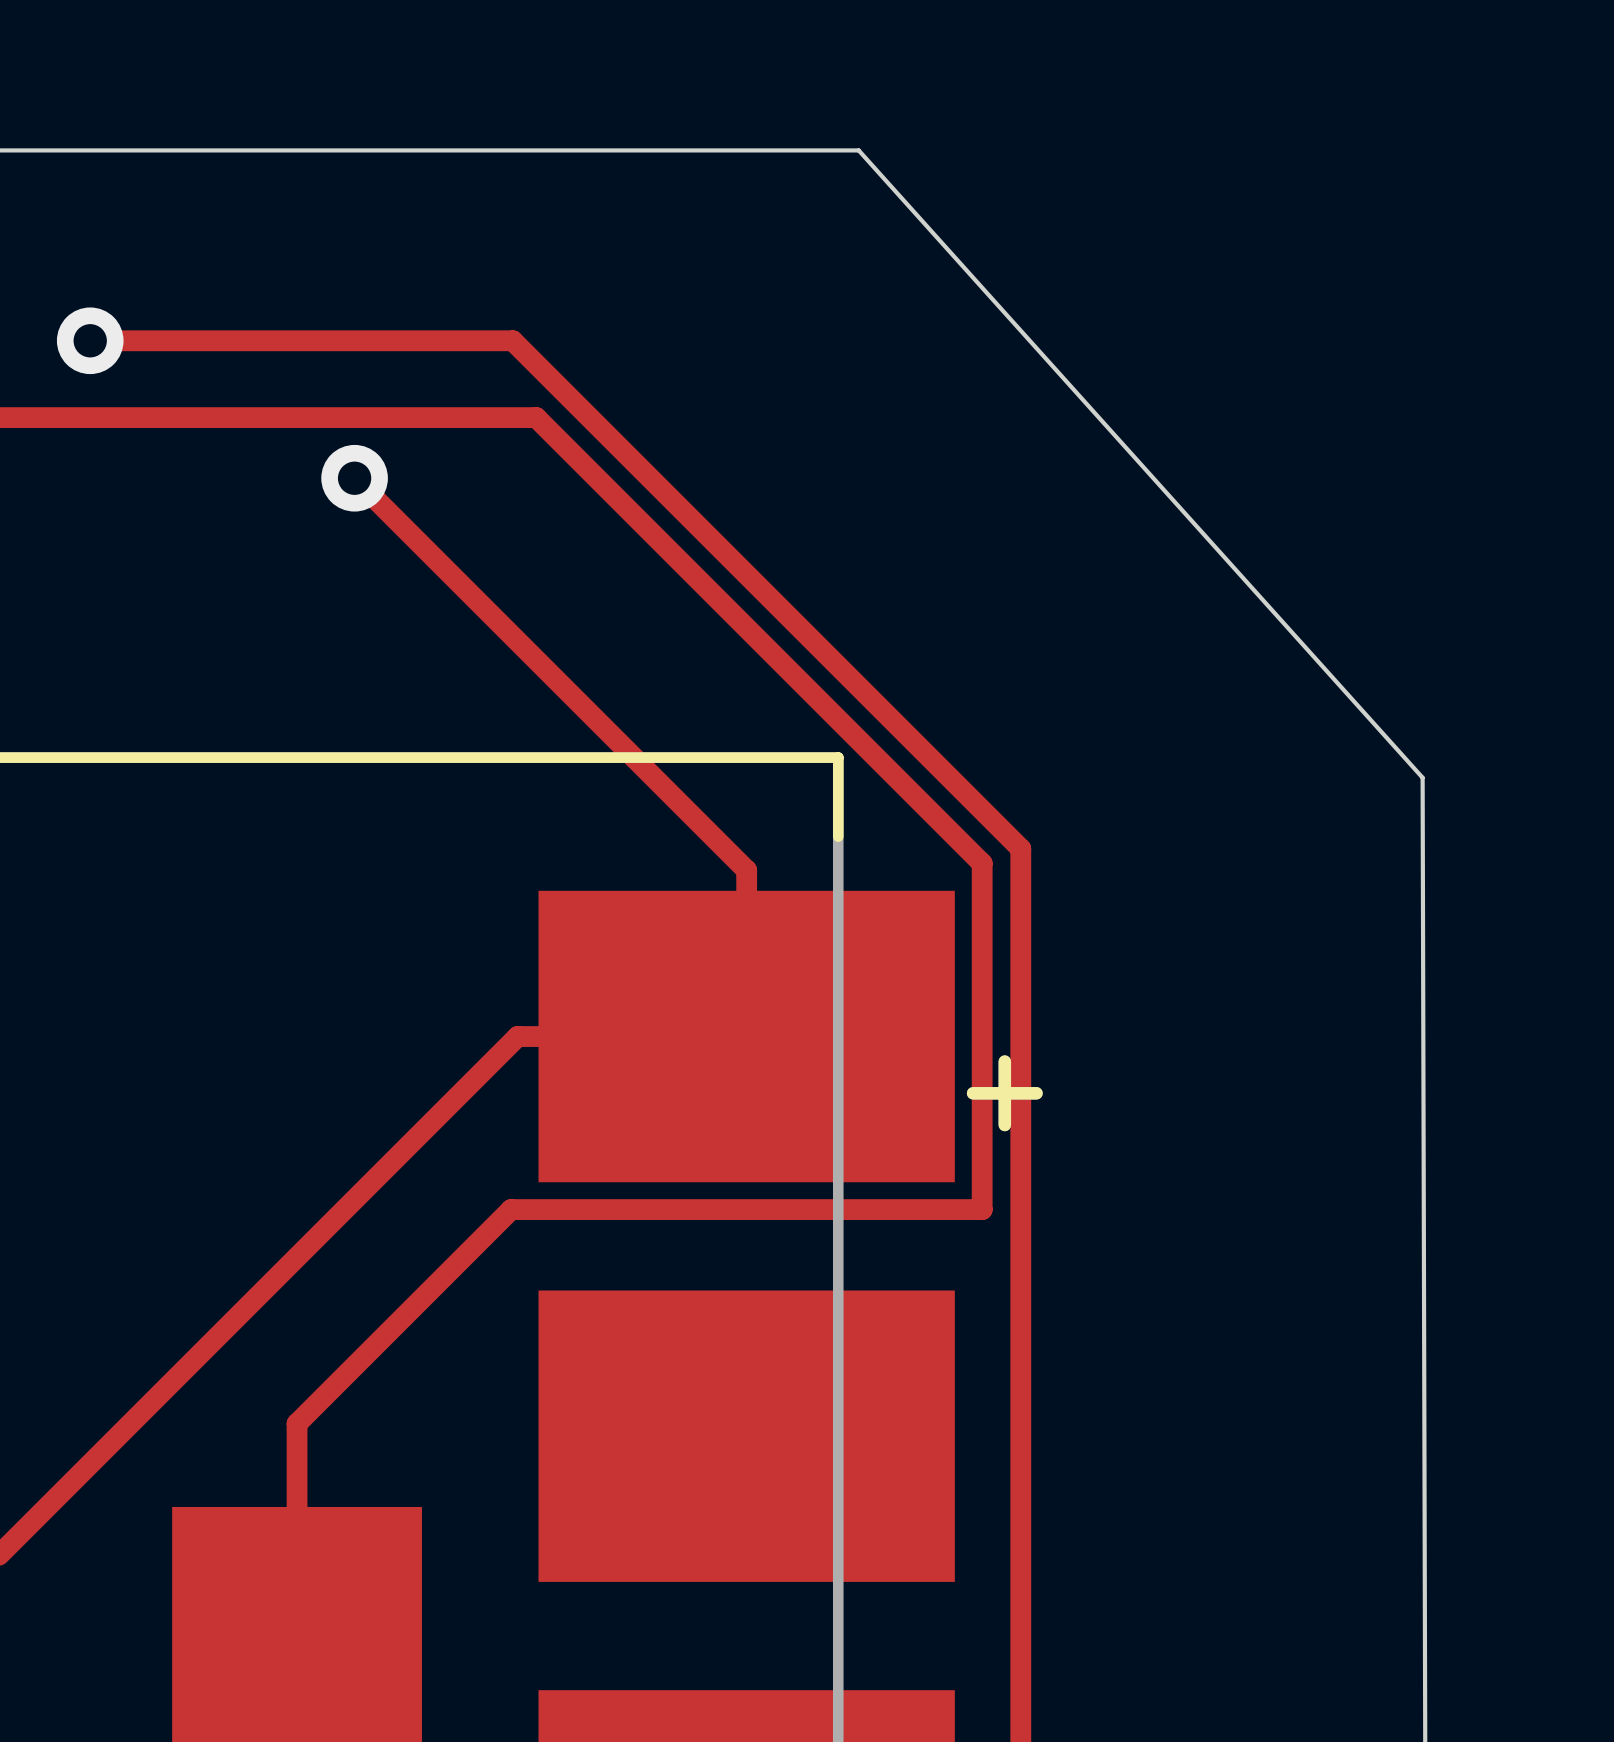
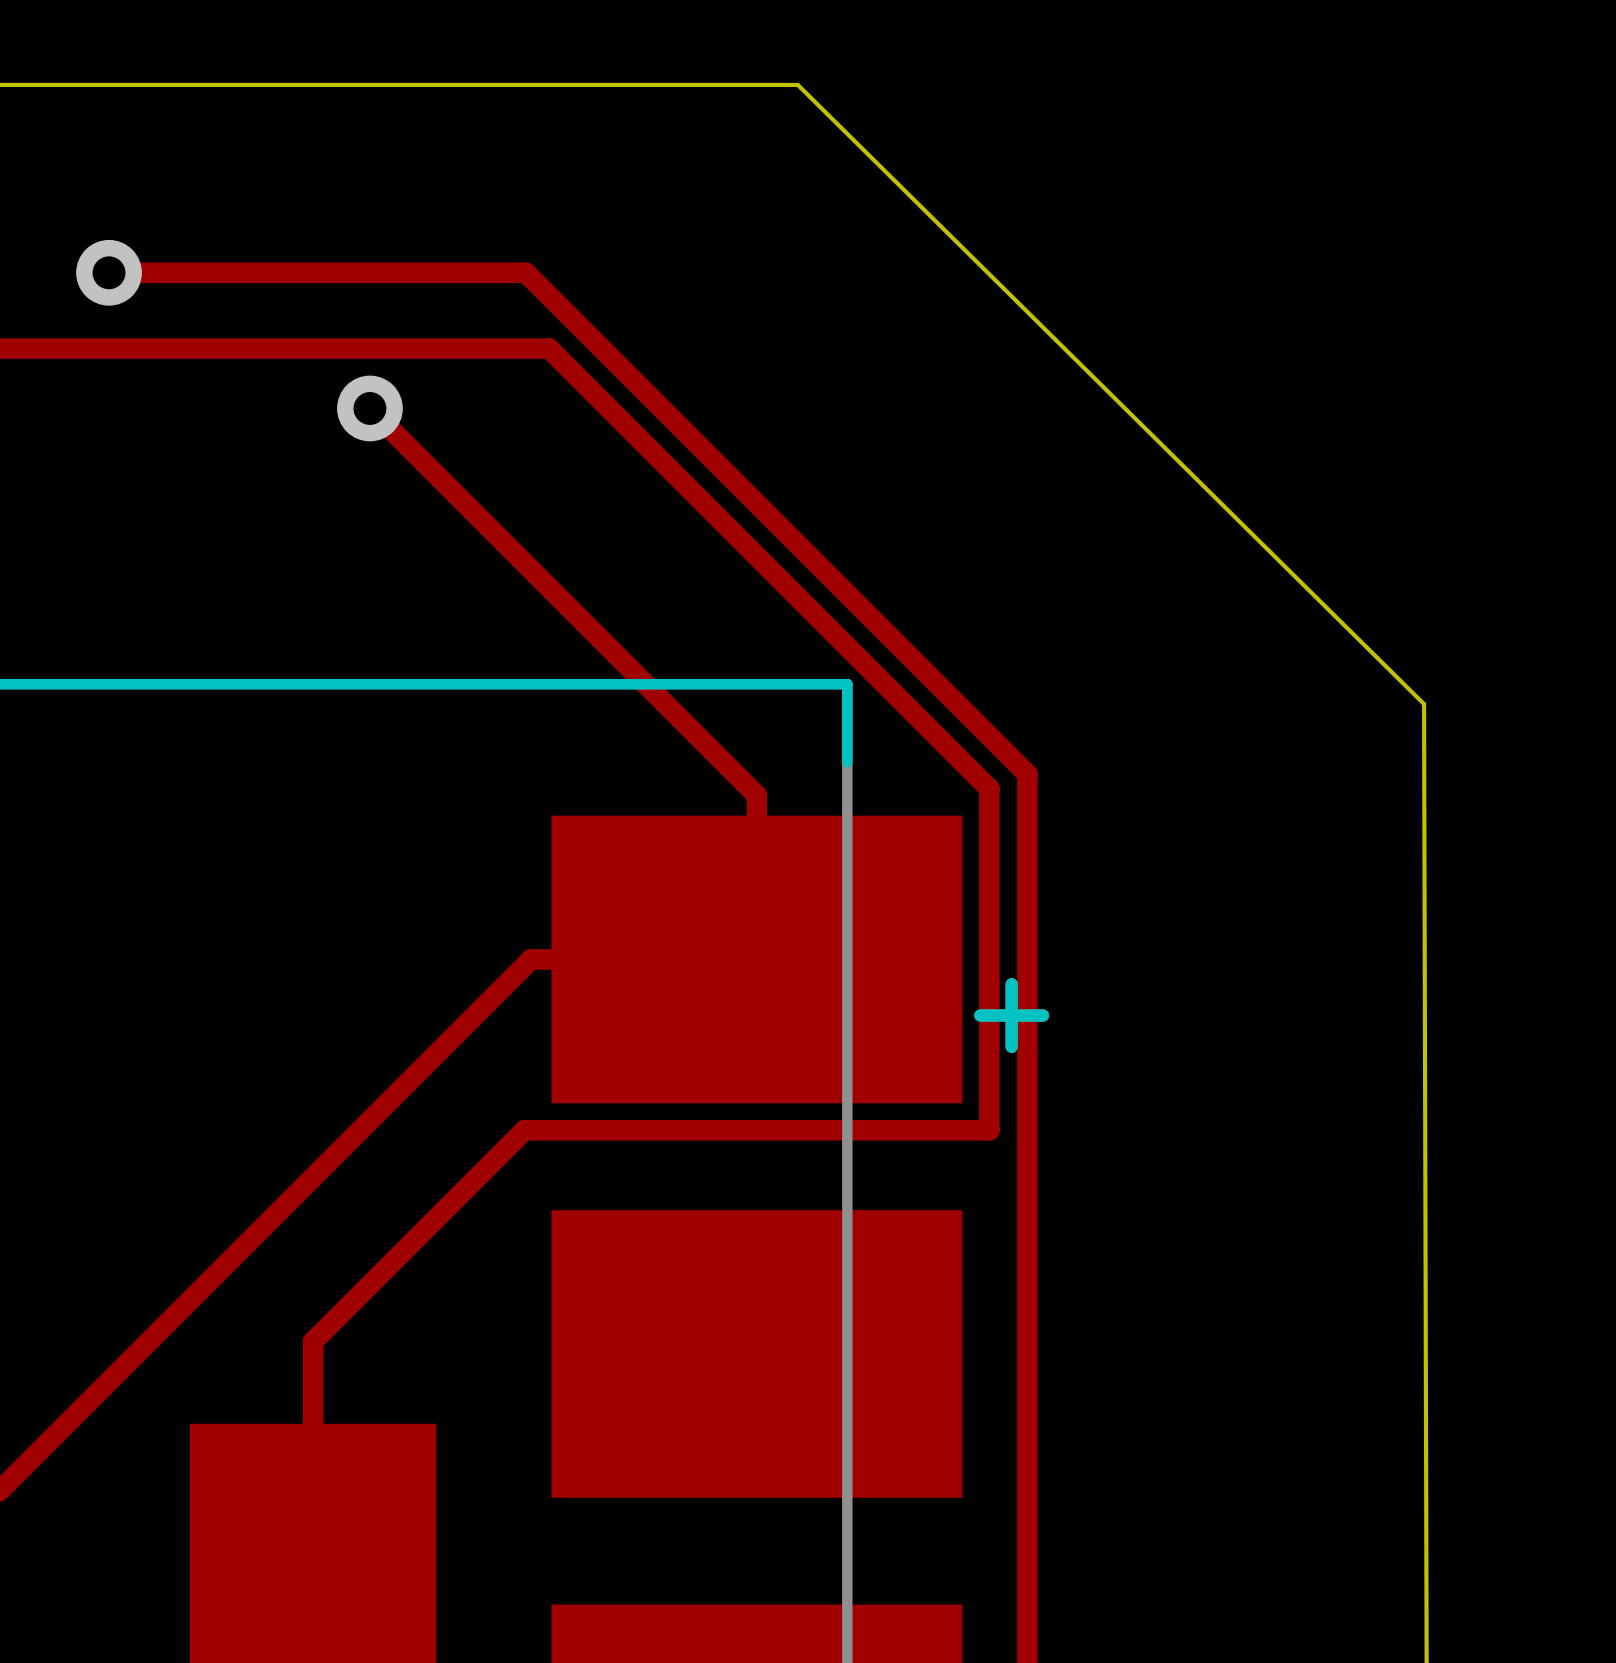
board edge: (788, 150) (858, 150) (1422, 777) -> (797, 84) (1424, 704)

